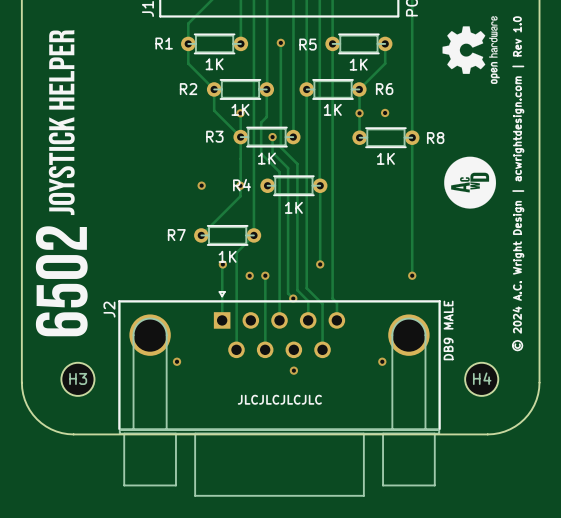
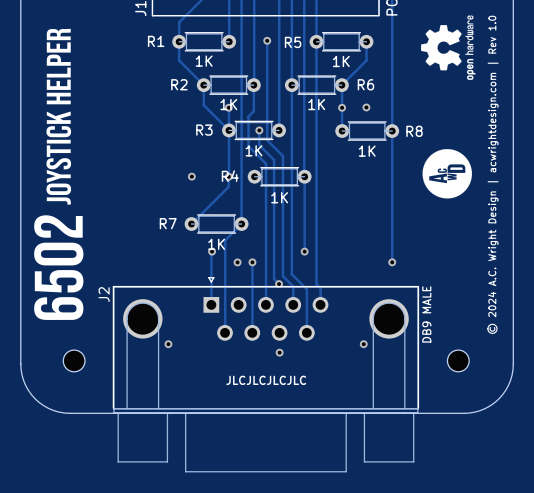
H3: (77, 379) -> none
part: none -> (74, 360)
H4: (481, 379) -> none
part: none -> (458, 360)

